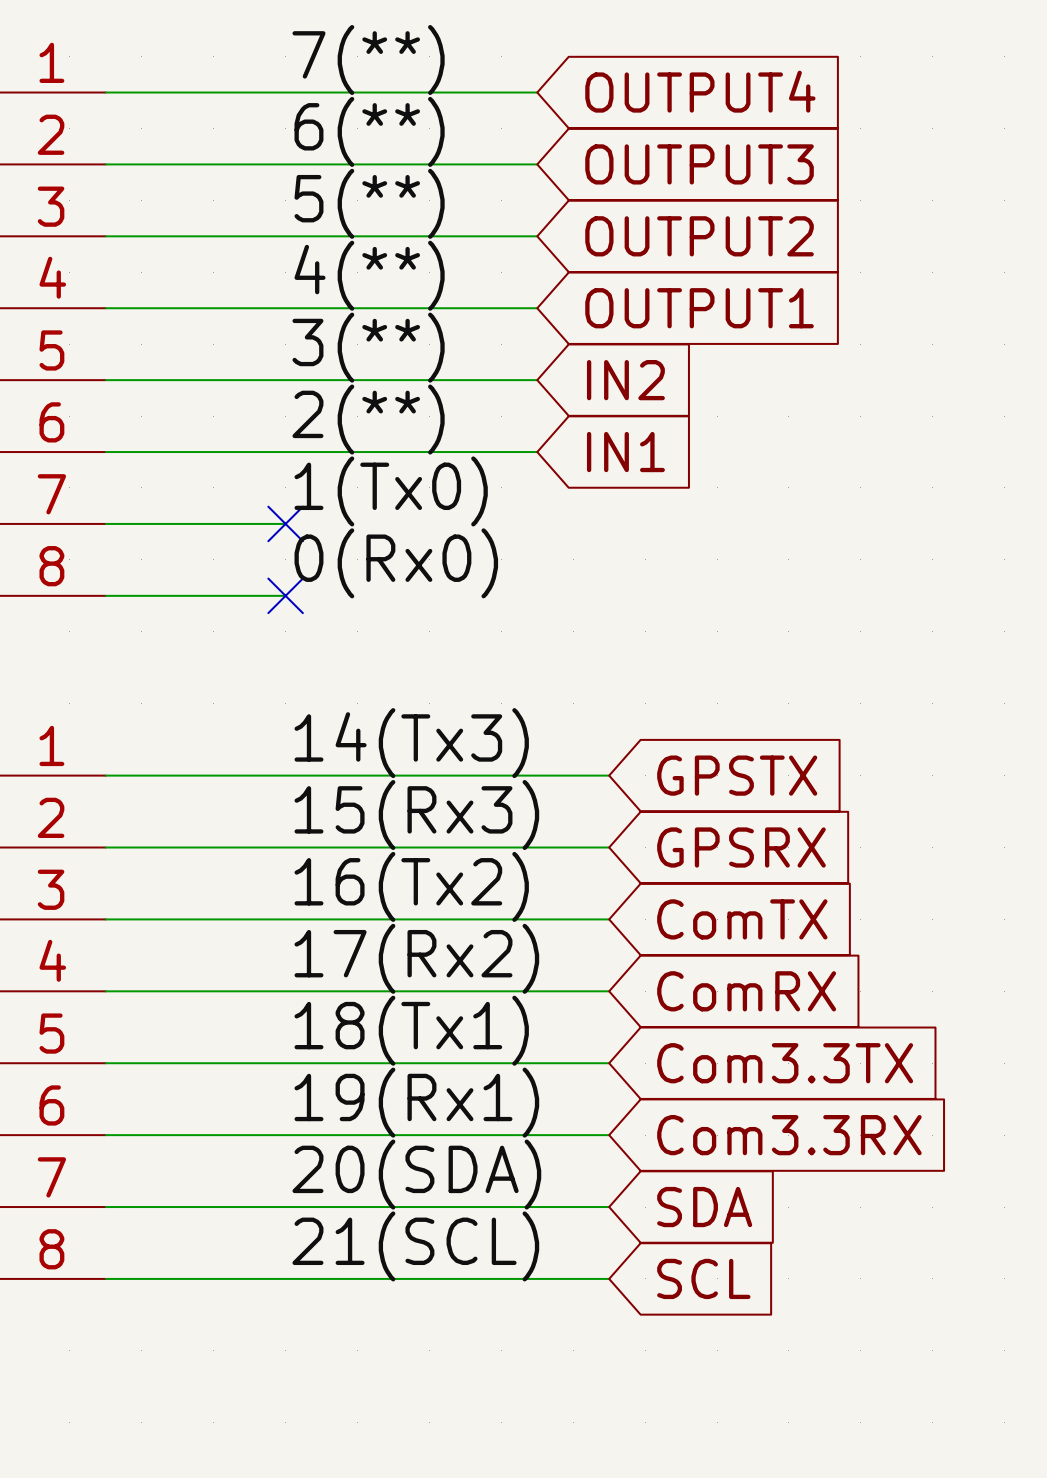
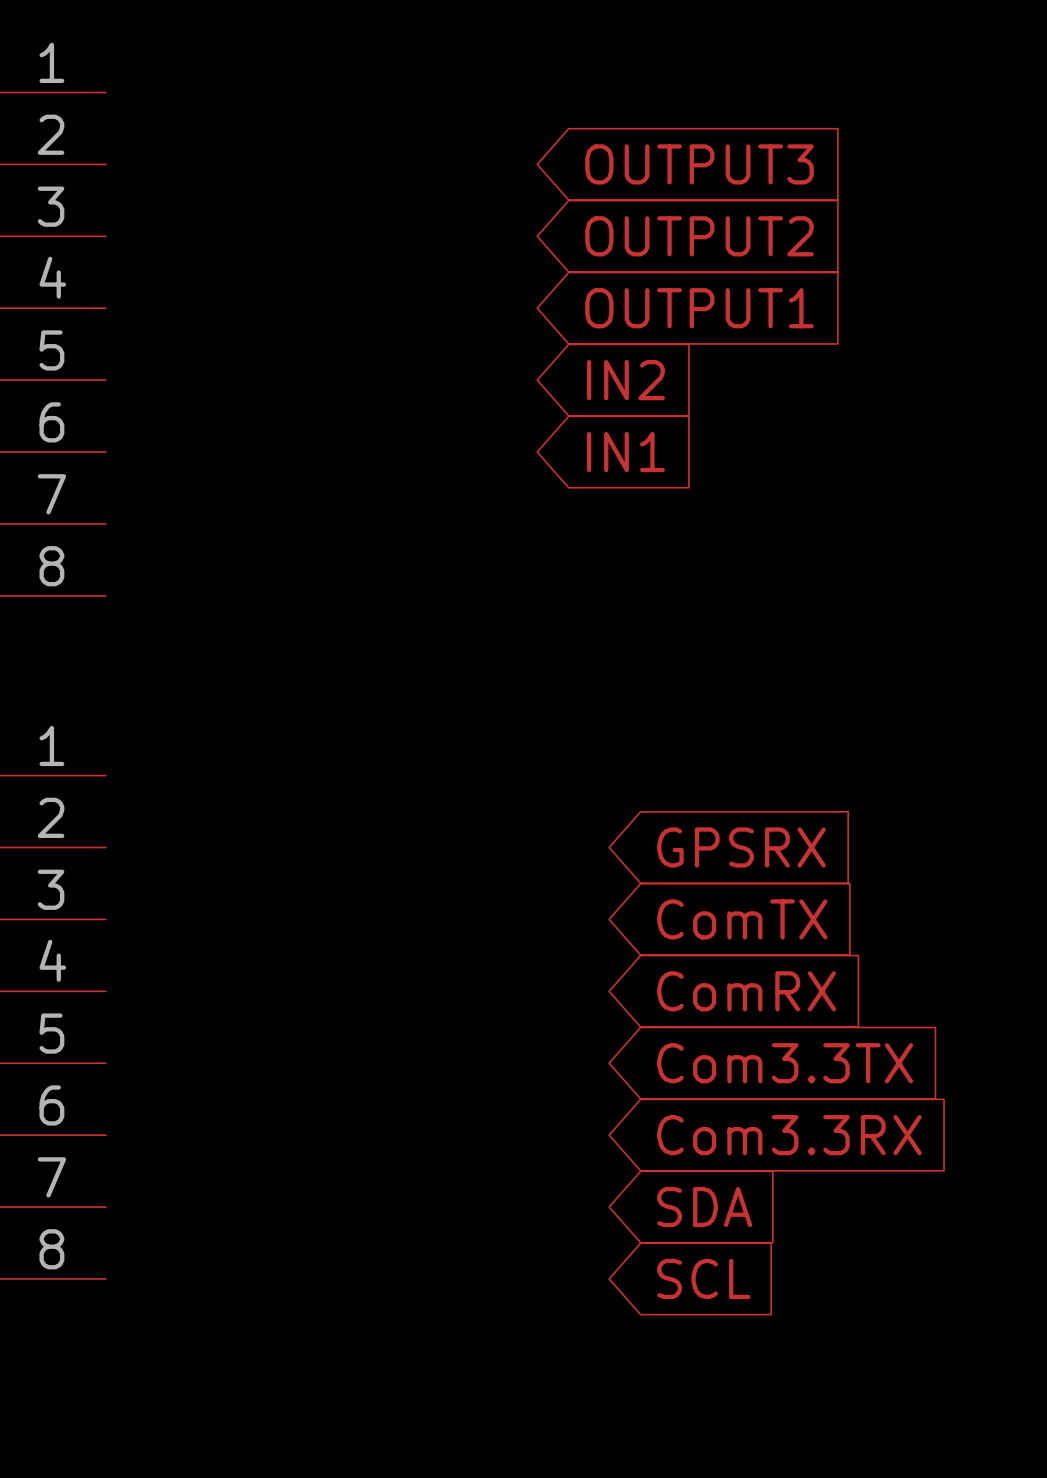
label: 7(**) (368, 60) -> none
global label: OUTPUT4 (700, 91) -> none
wire: (105, 92) (537, 92) -> none
label: 6(**) (369, 131) -> none
wire: (105, 164) (537, 164) -> none
label: 5(**) (369, 203) -> none
wire: (105, 236) (537, 236) -> none
label: 4(**) (369, 275) -> none
wire: (105, 308) (537, 308) -> none
label: 3(**) (368, 347) -> none
wire: (105, 380) (537, 380) -> none
label: 2(**) (368, 419) -> none
wire: (105, 452) (537, 452) -> none
label: 1(Tx0) (391, 491) -> none
wire: (105, 523) (285, 523) -> none
no-connect mark: (285, 523) -> none
label: 0(Rx0) (396, 563) -> none
wire: (105, 595) (285, 595) -> none
no-connect mark: (285, 595) -> none
label: 14(Tx3) (411, 743) -> none
wire: (105, 775) (609, 775) -> none
global label: GPSTX (737, 775) -> none
label: 15(Rx3) (416, 815) -> none
wire: (105, 847) (609, 847) -> none
label: 16(Tx2) (411, 886) -> none
wire: (105, 919) (609, 919) -> none
label: 17(Rx2) (416, 958) -> none
wire: (105, 991) (609, 991) -> none
label: 18(Tx1) (411, 1030) -> none
wire: (105, 1063) (609, 1063) -> none
label: 19(Rx1) (416, 1102) -> none
wire: (105, 1135) (609, 1135) -> none
label: 20(SDA) (416, 1174) -> none
wire: (105, 1207) (609, 1207) -> none
label: 21(SCL) (415, 1246) -> none
wire: (105, 1278) (609, 1278) -> none

